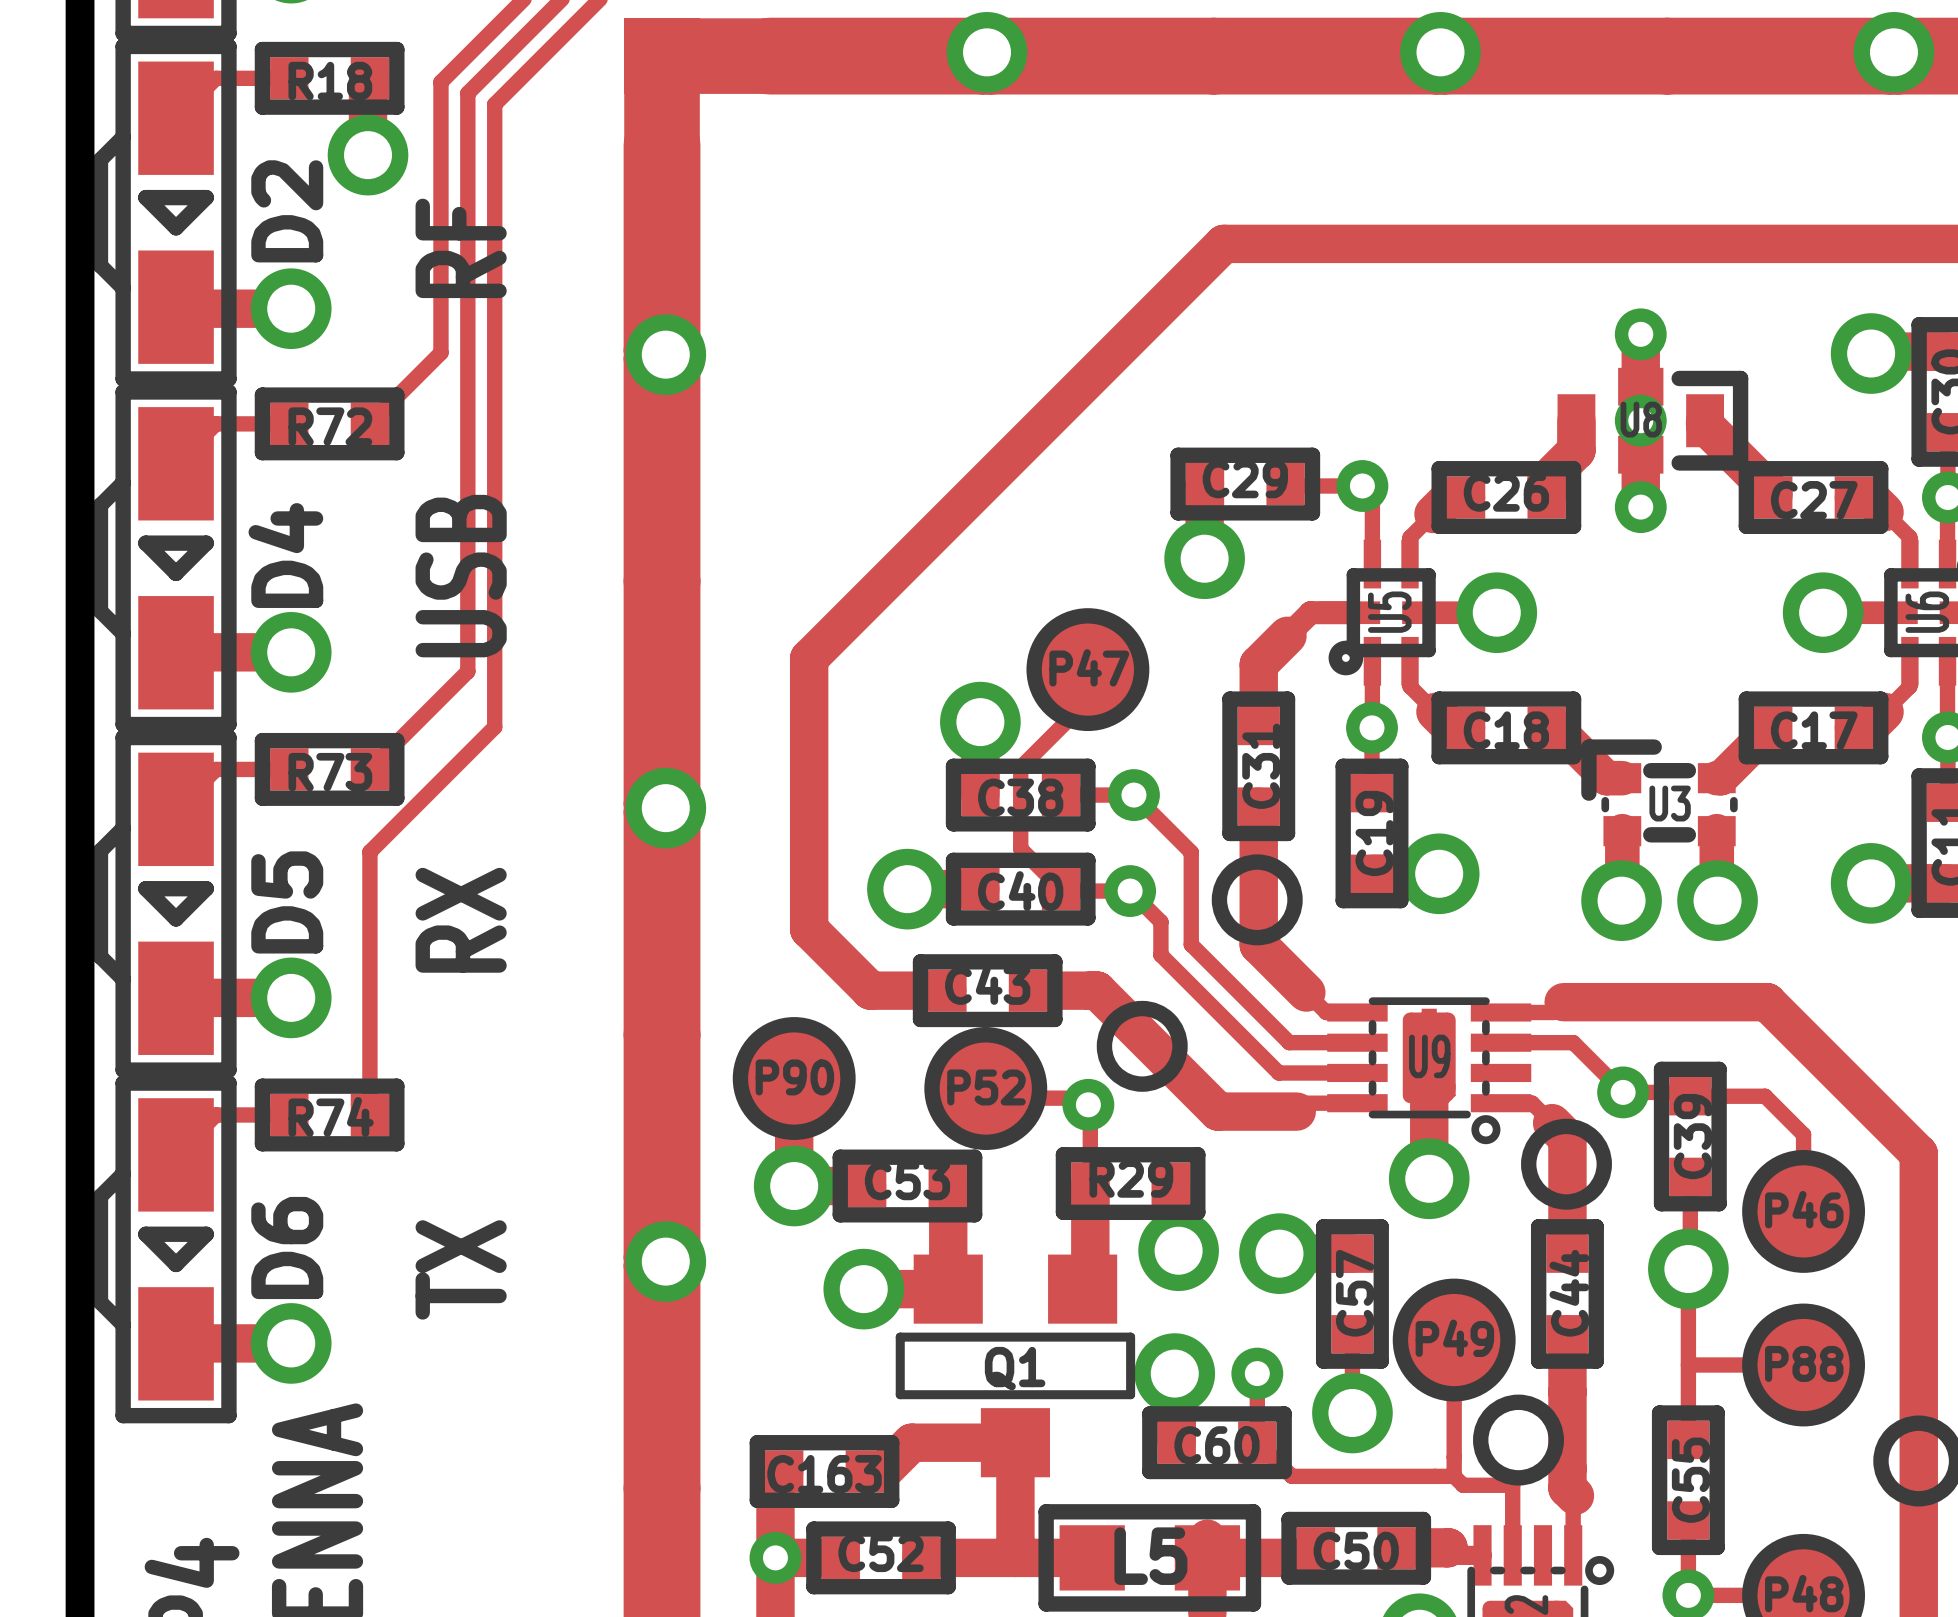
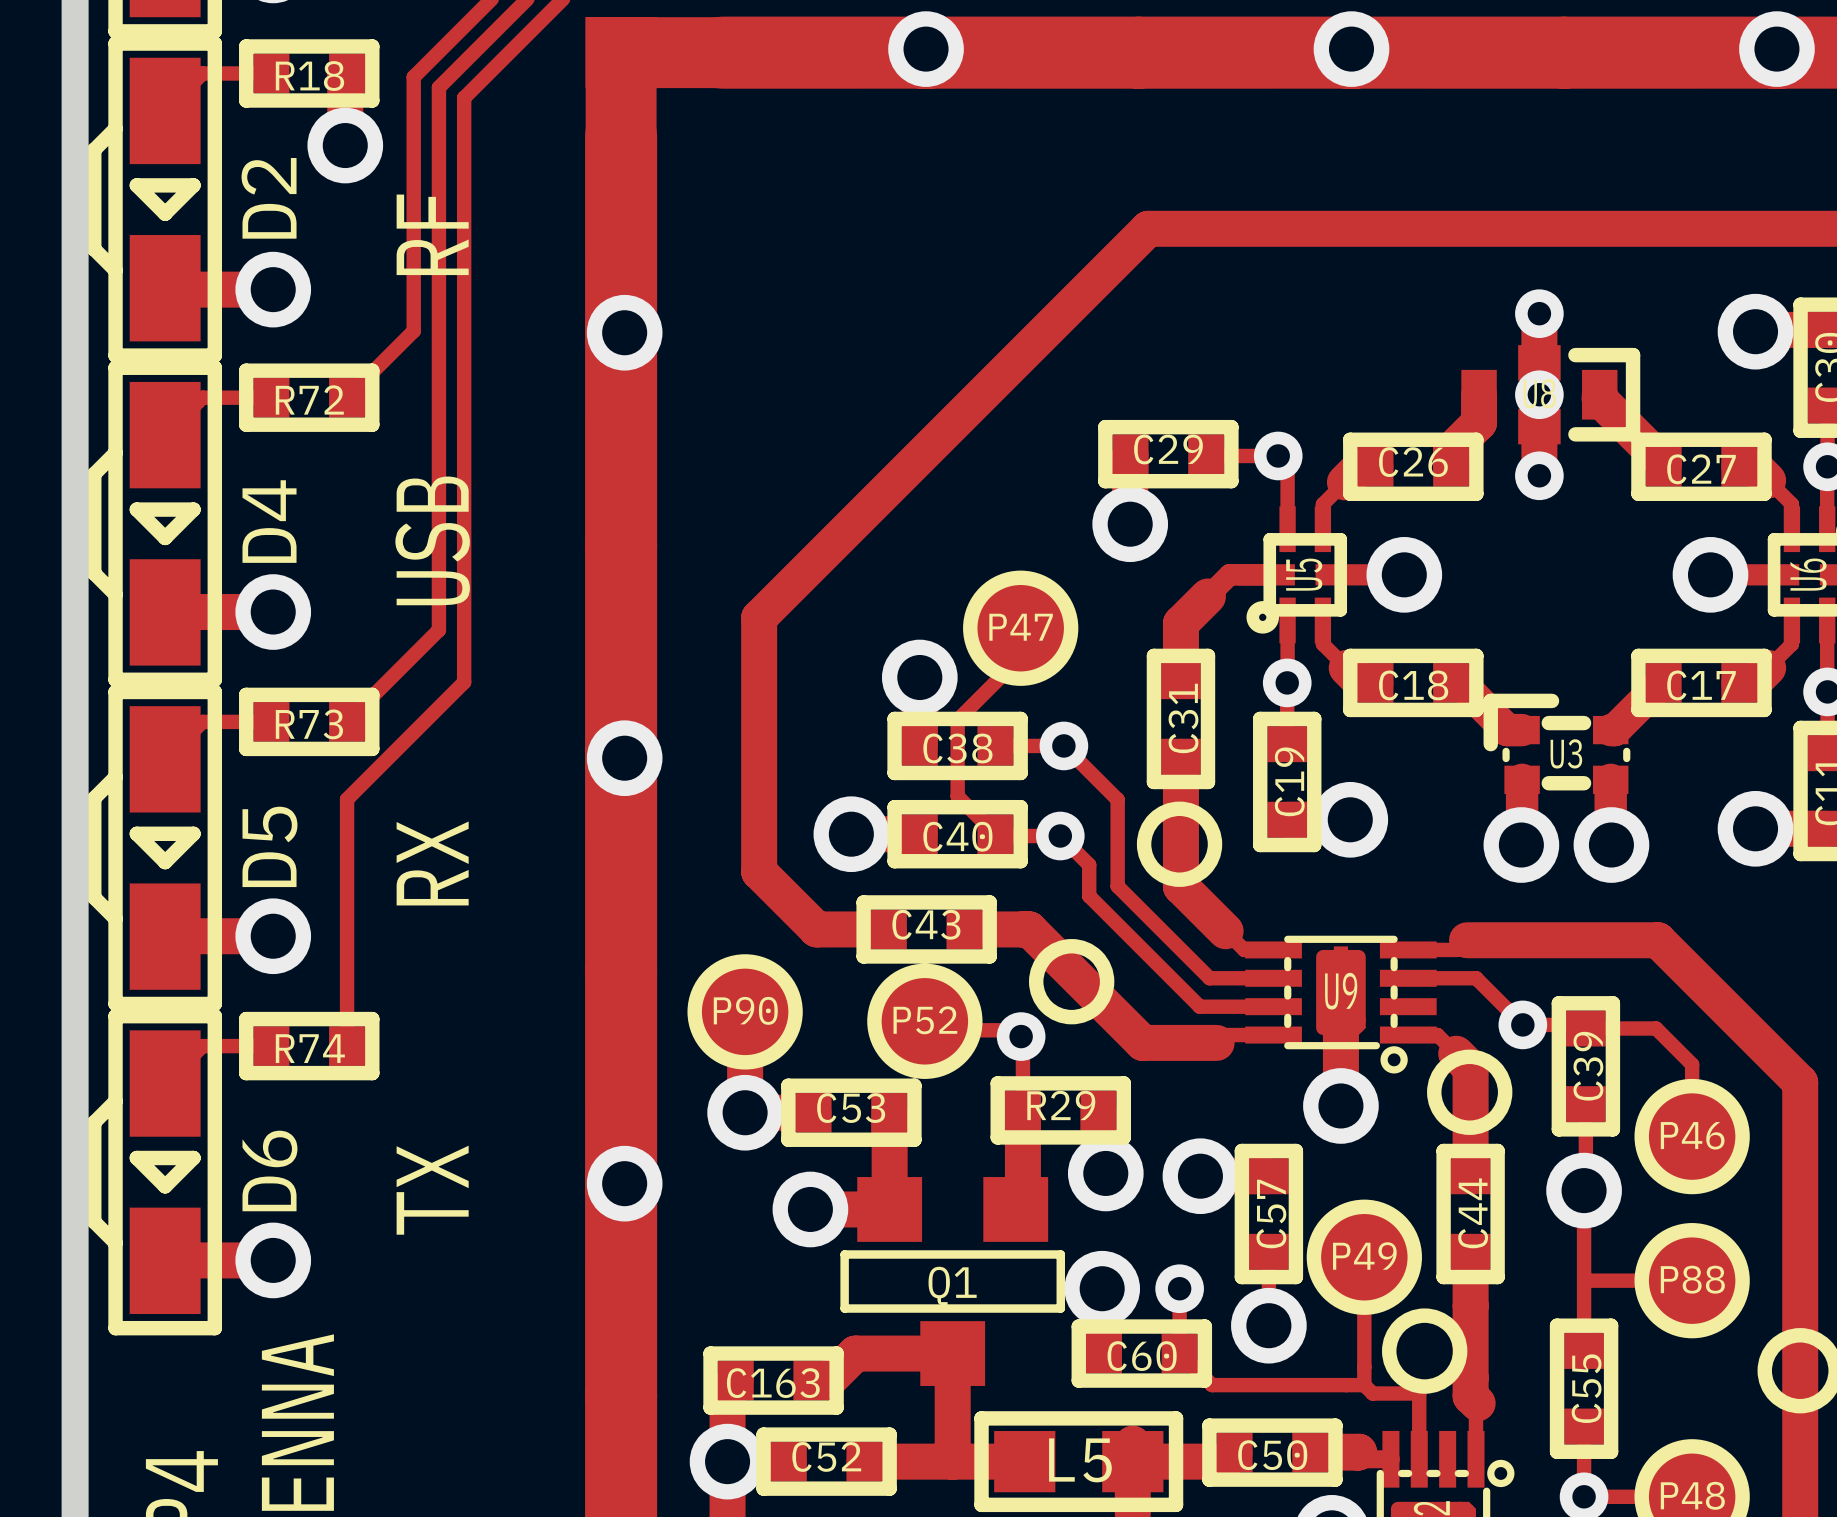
via size: [749, 1531, 802, 1584] -> [689, 1423, 766, 1500]

